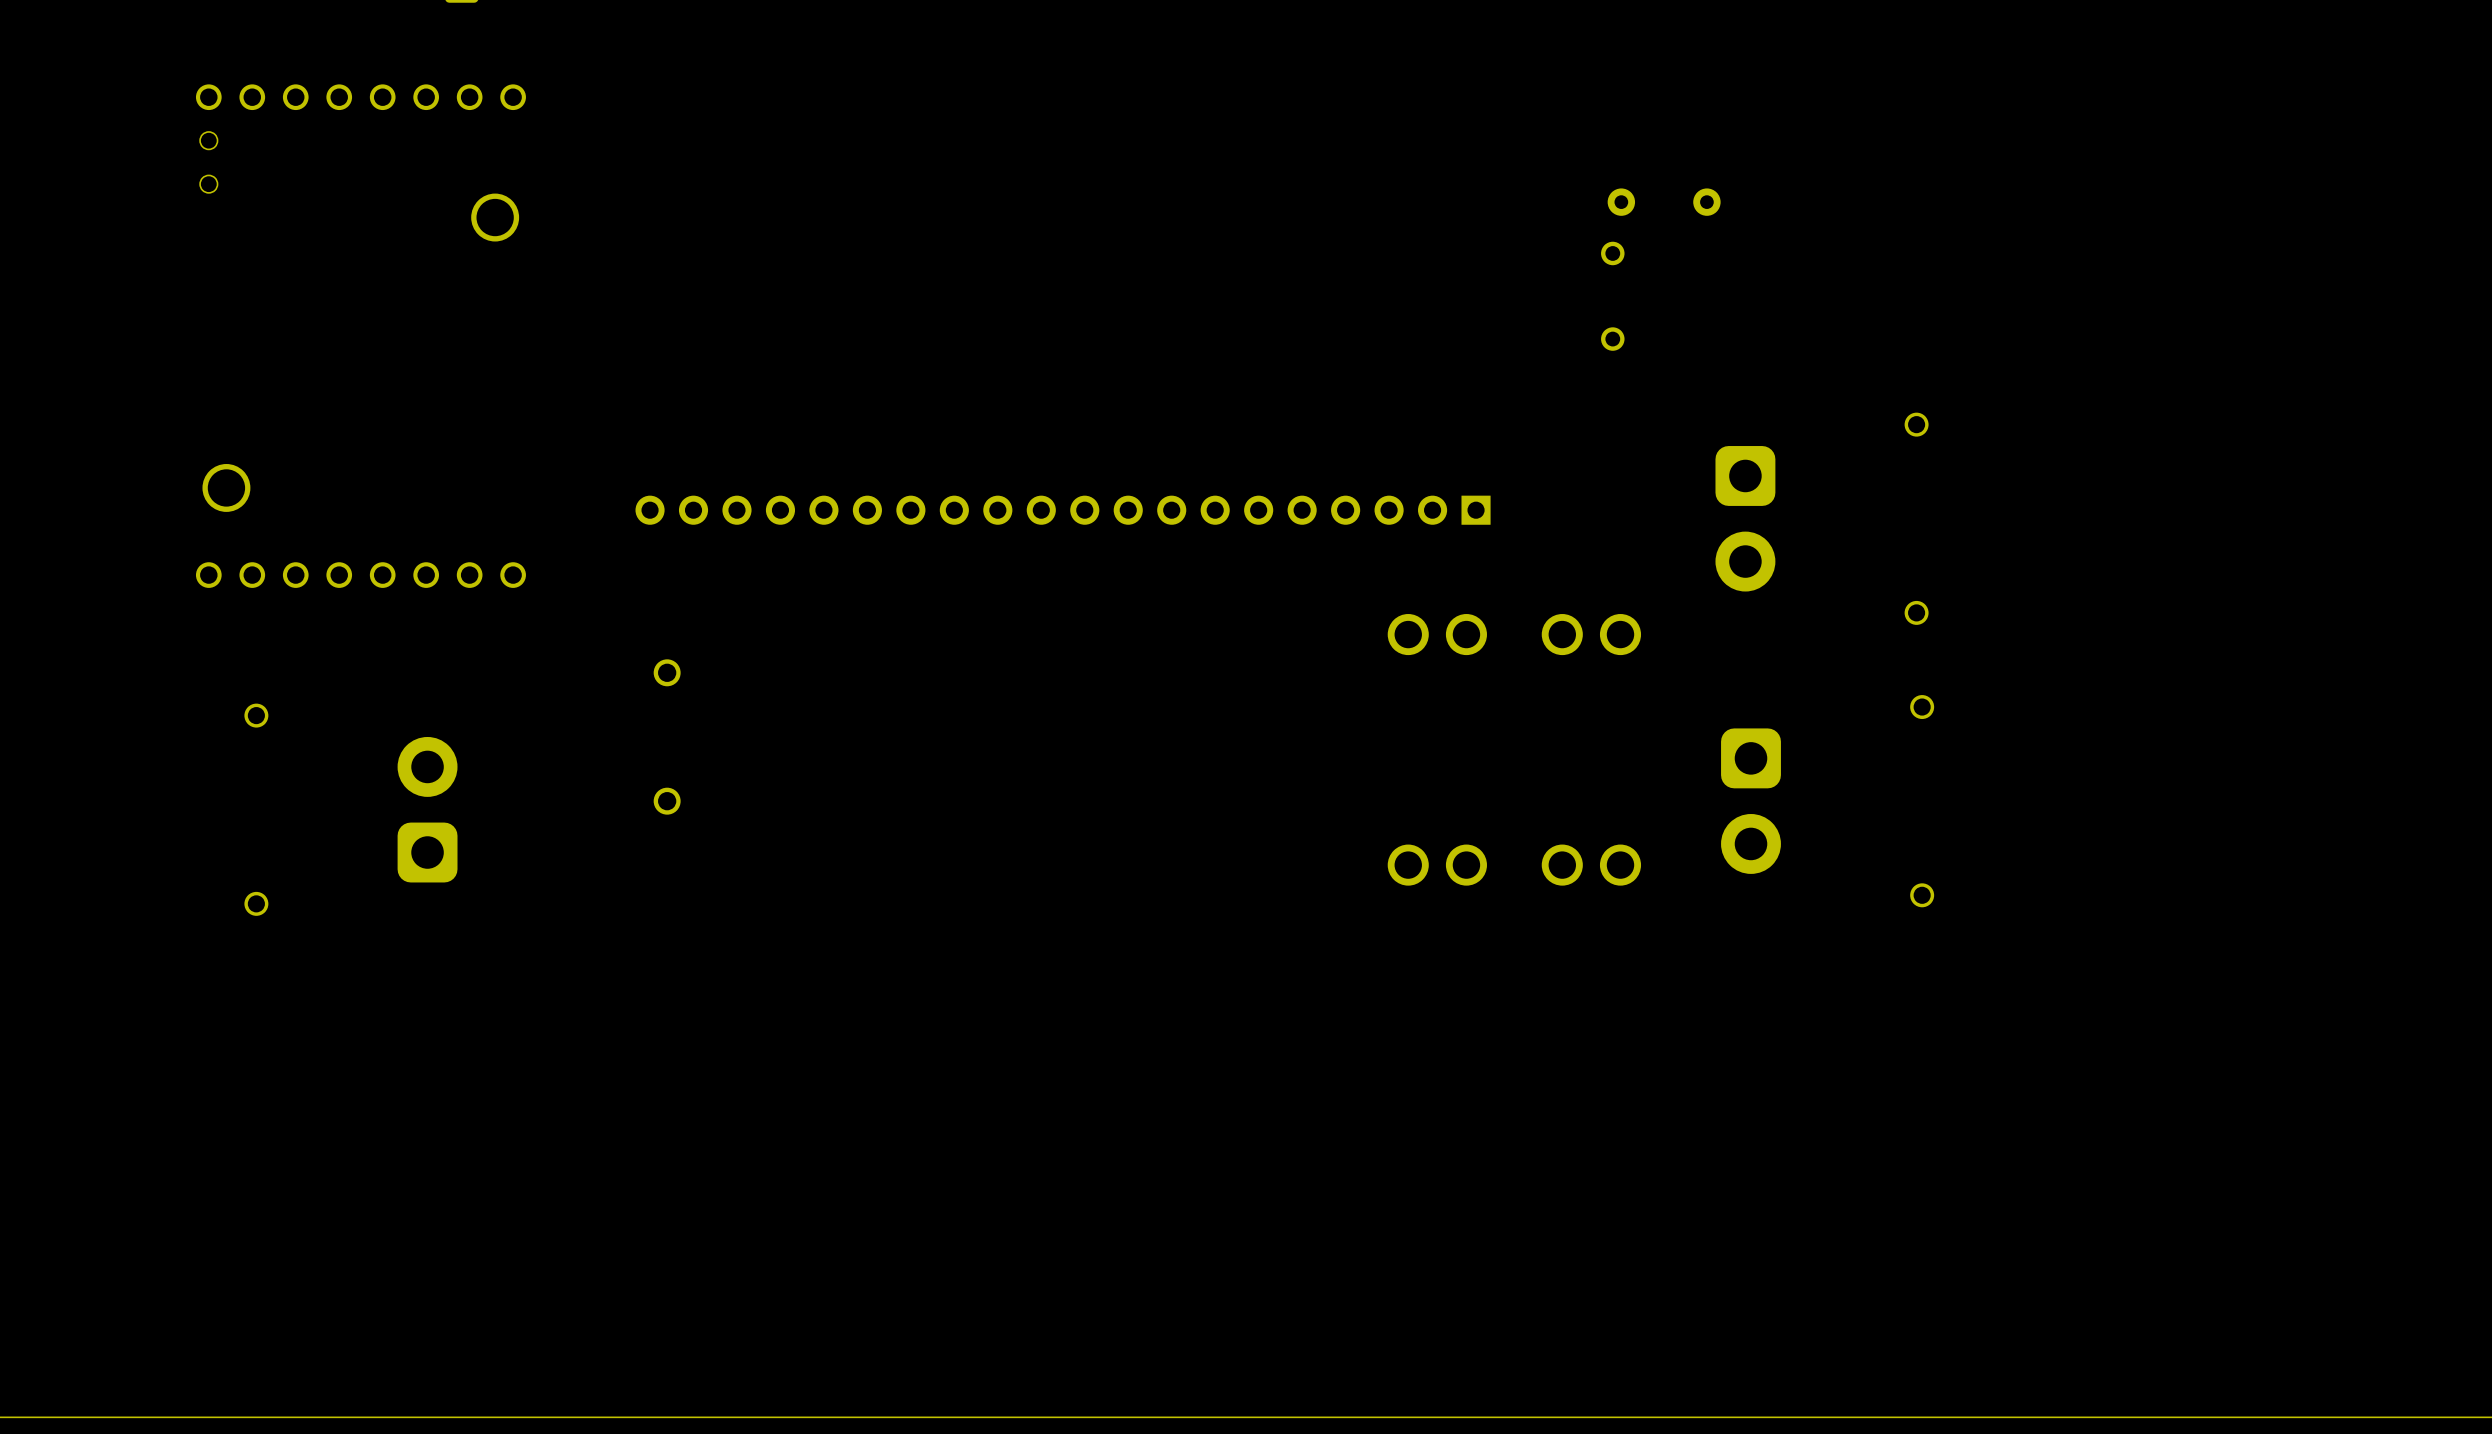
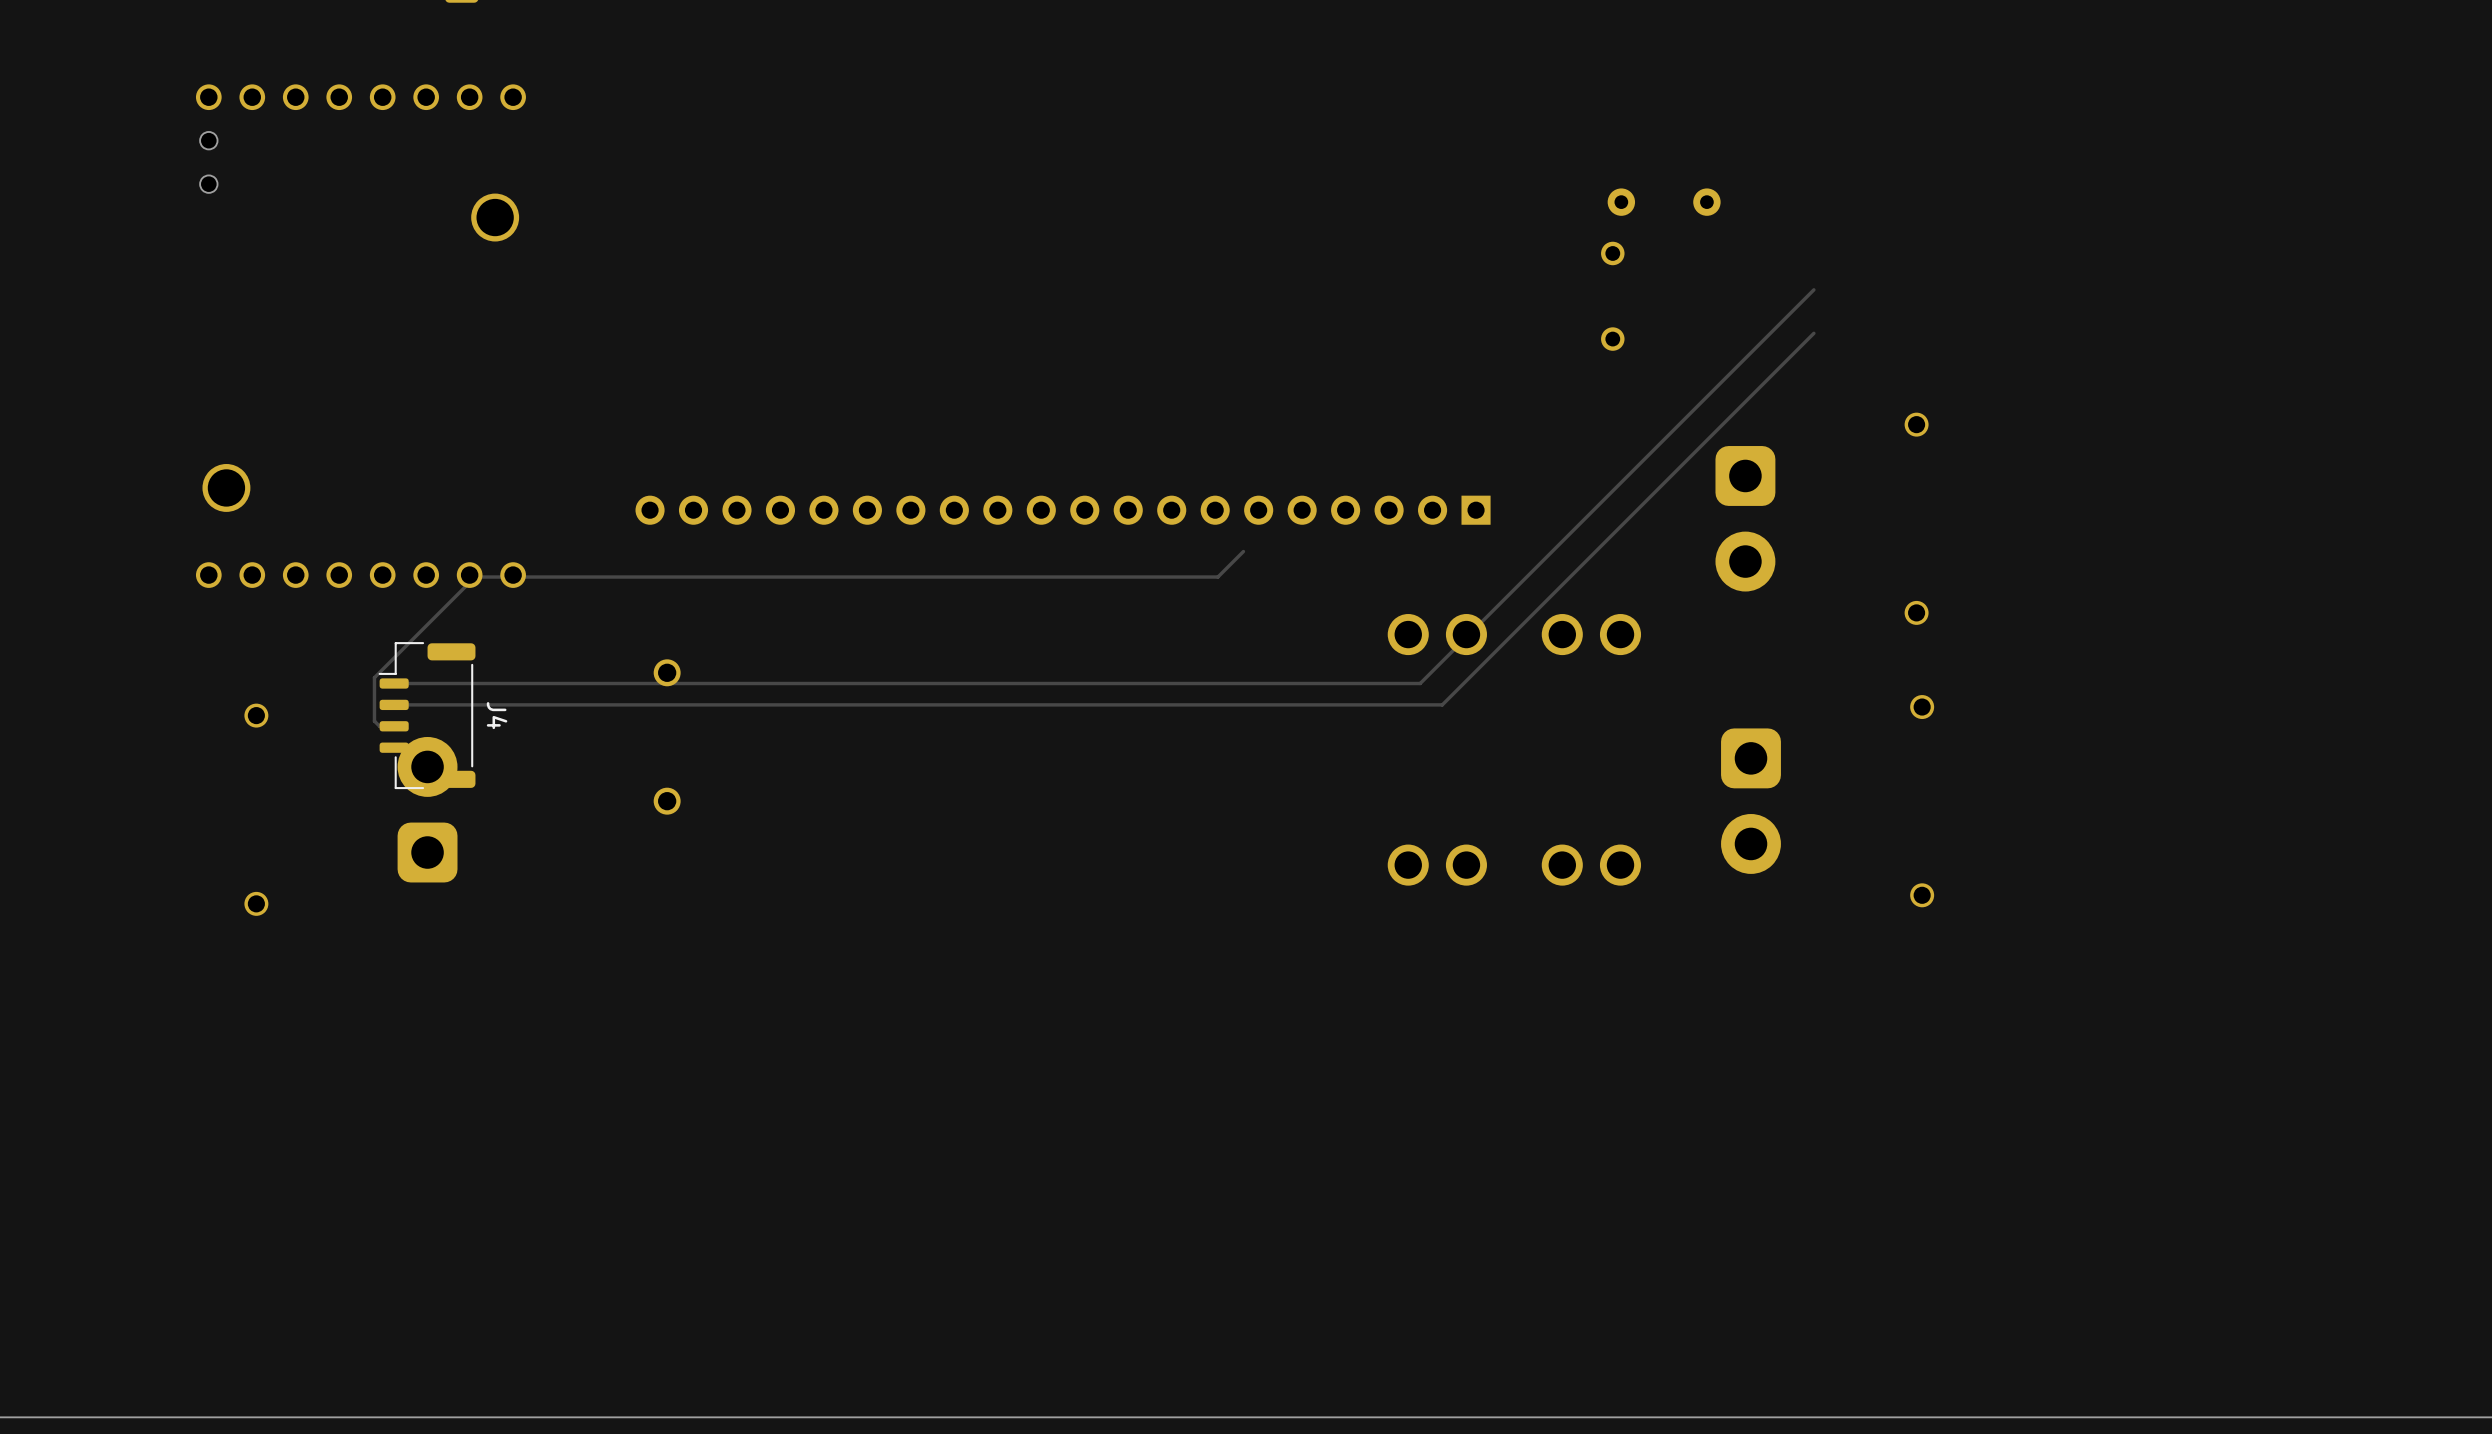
track: none -> (1813, 289) (1420, 683) (394, 683)
track: none -> (1813, 333) (1442, 704) (394, 704)
track: none -> (1243, 551) (1217, 577) (475, 577) (374, 677) (374, 721) (379, 726) (394, 726)
J4: none -> (427, 715)

